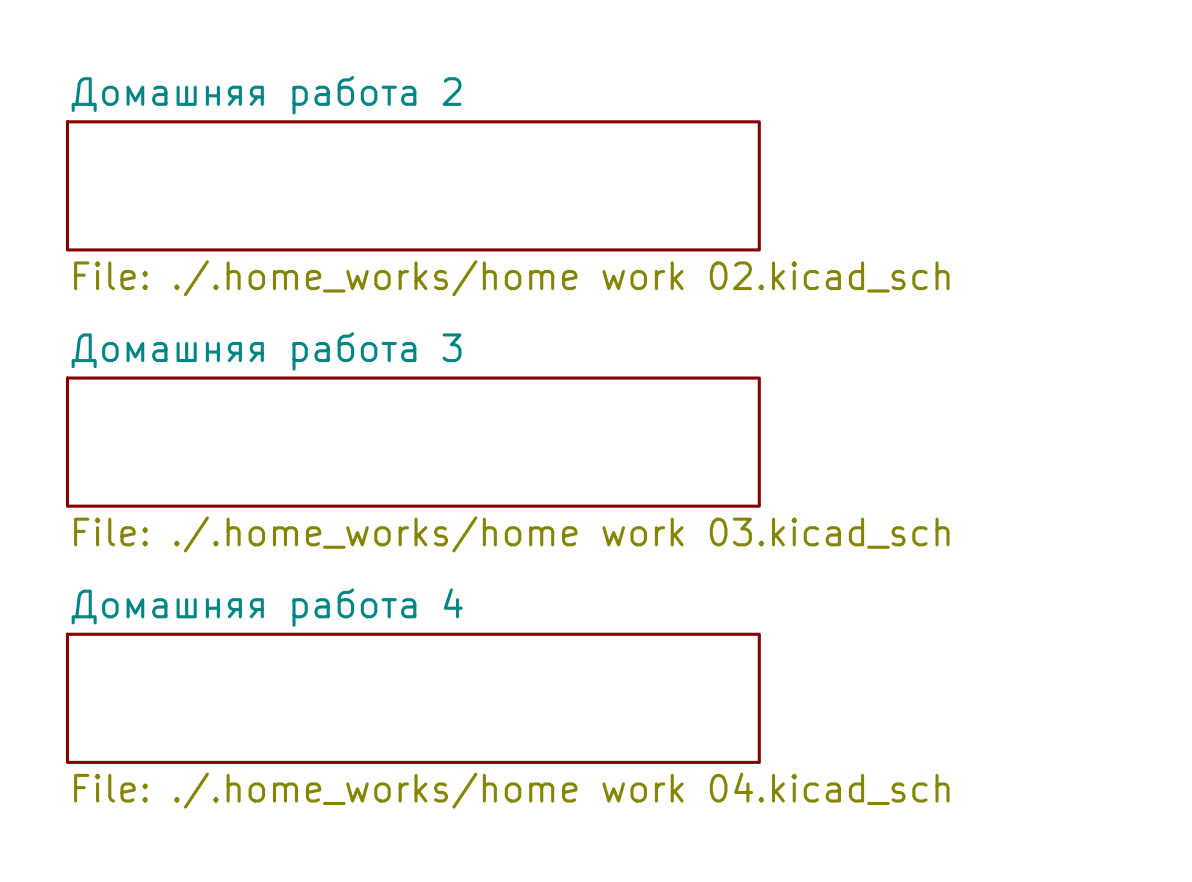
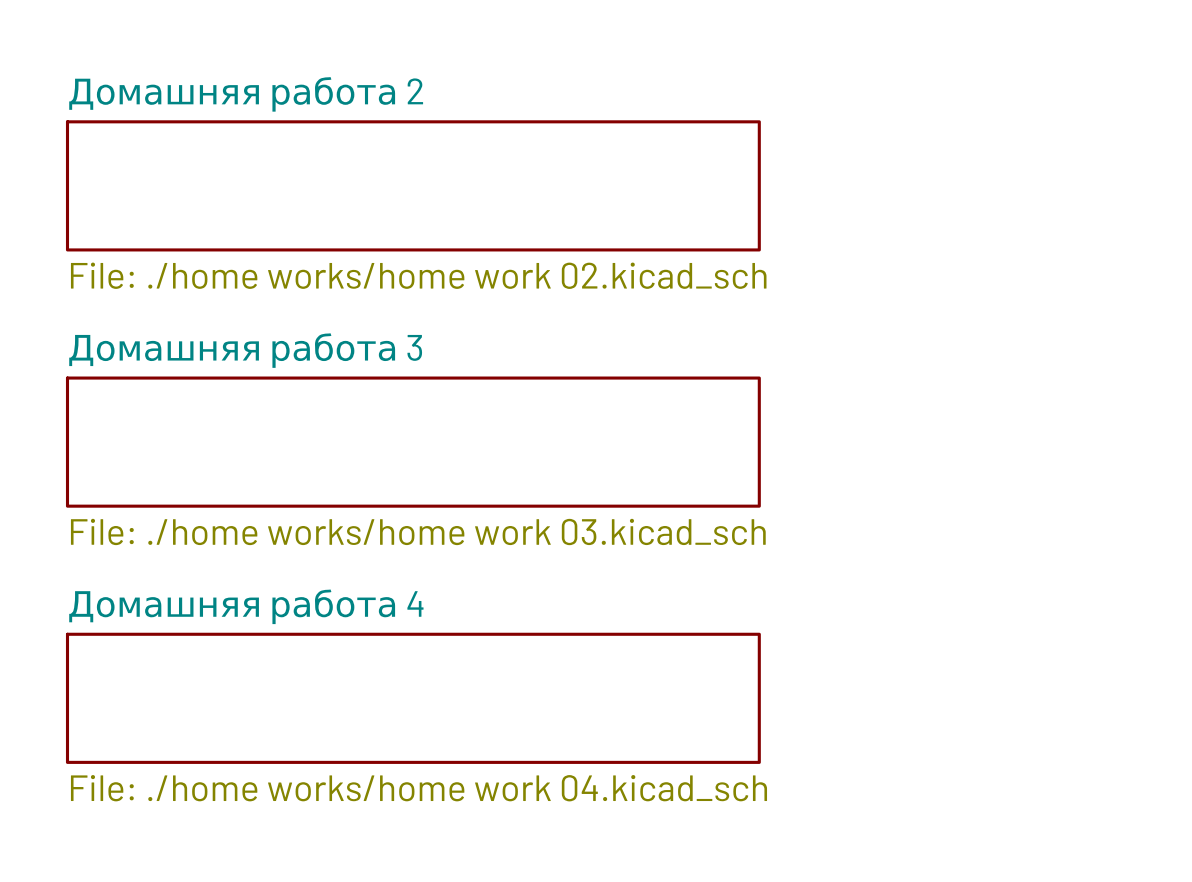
sheet Домашняя работа 2 value: File: ./.home_works/home work 02.kicad_sch (511, 278) -> File: ./home works/home work 02.kicad_sch (418, 275)
sheet Домашняя работа 3 value: File: ./.home_works/home work 03.kicad_sch (511, 534) -> File: ./home works/home work 03.kicad_sch (418, 531)
sheet Домашняя работа 4 value: File: ./.home_works/home work 04.kicad_sch (511, 790) -> File: ./home works/home work 04.kicad_sch (418, 788)

